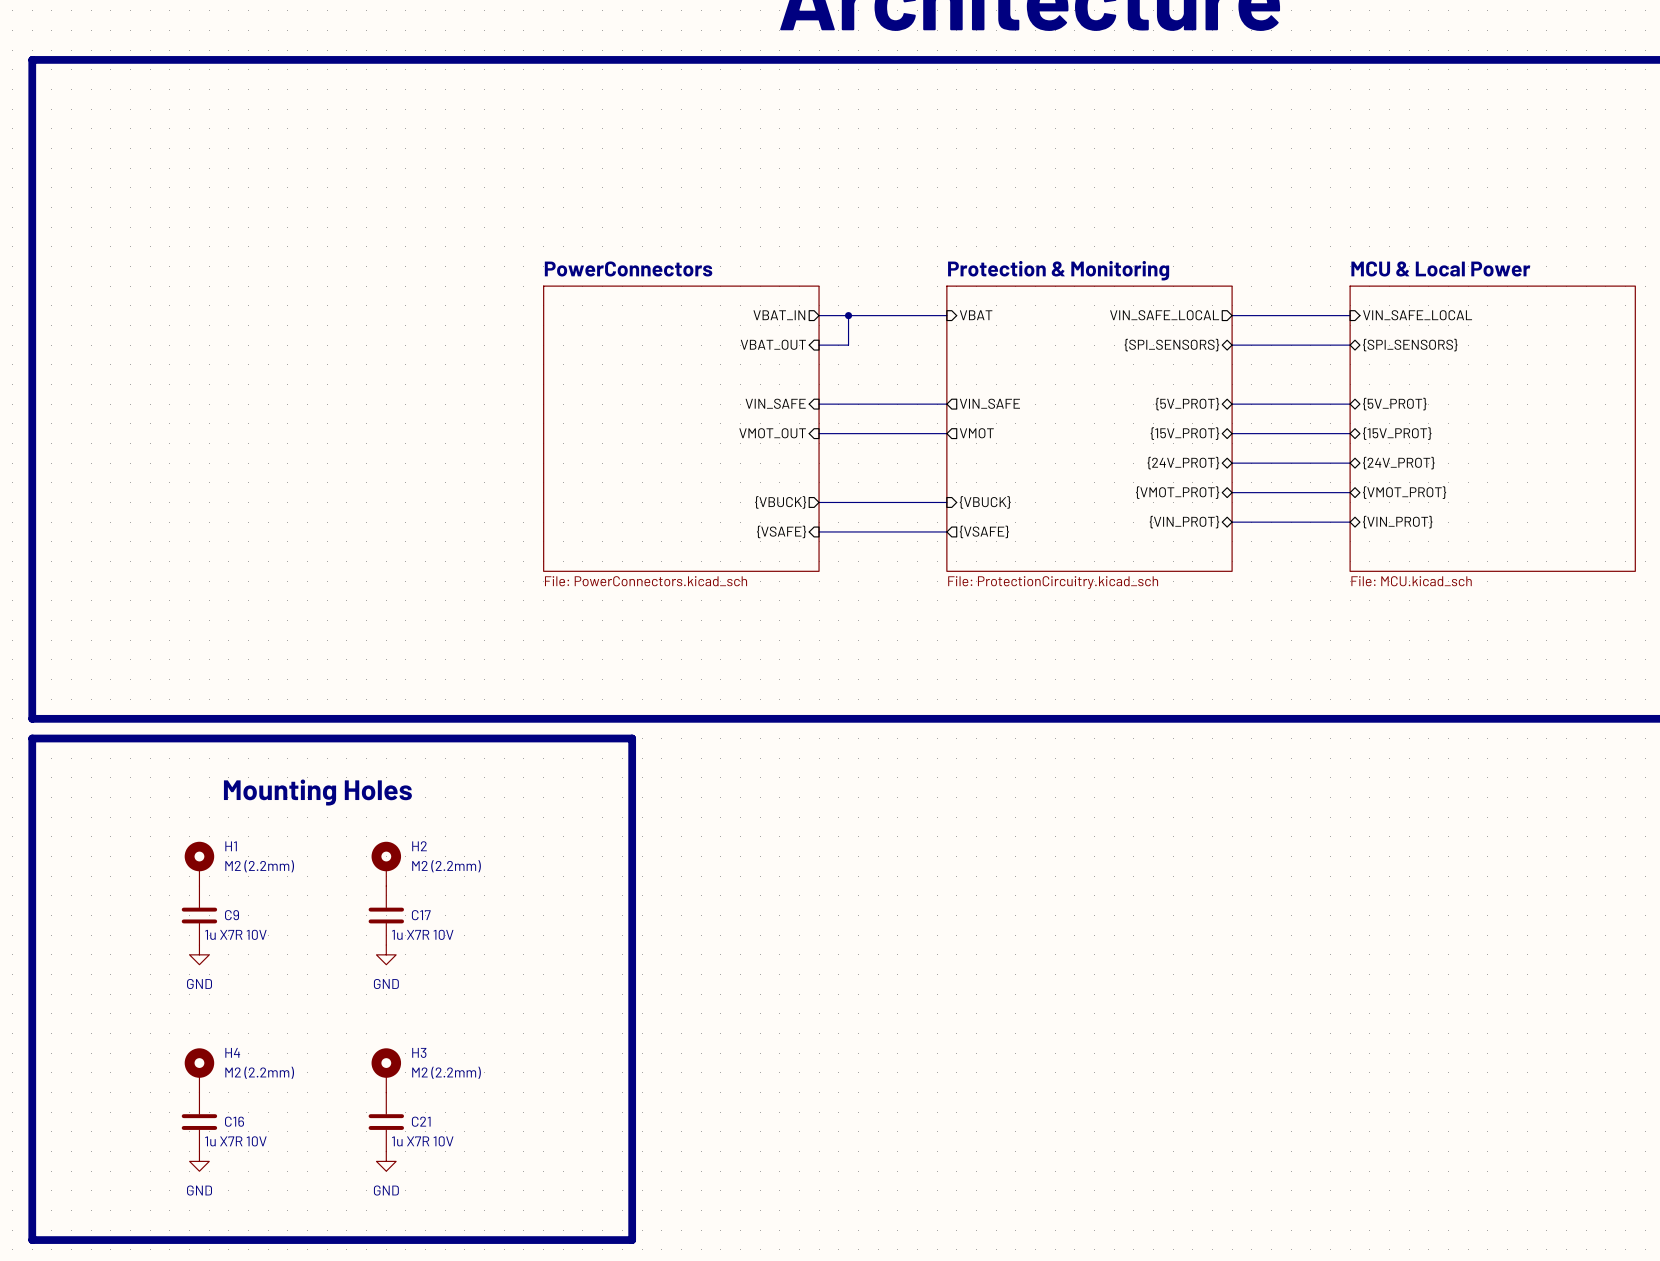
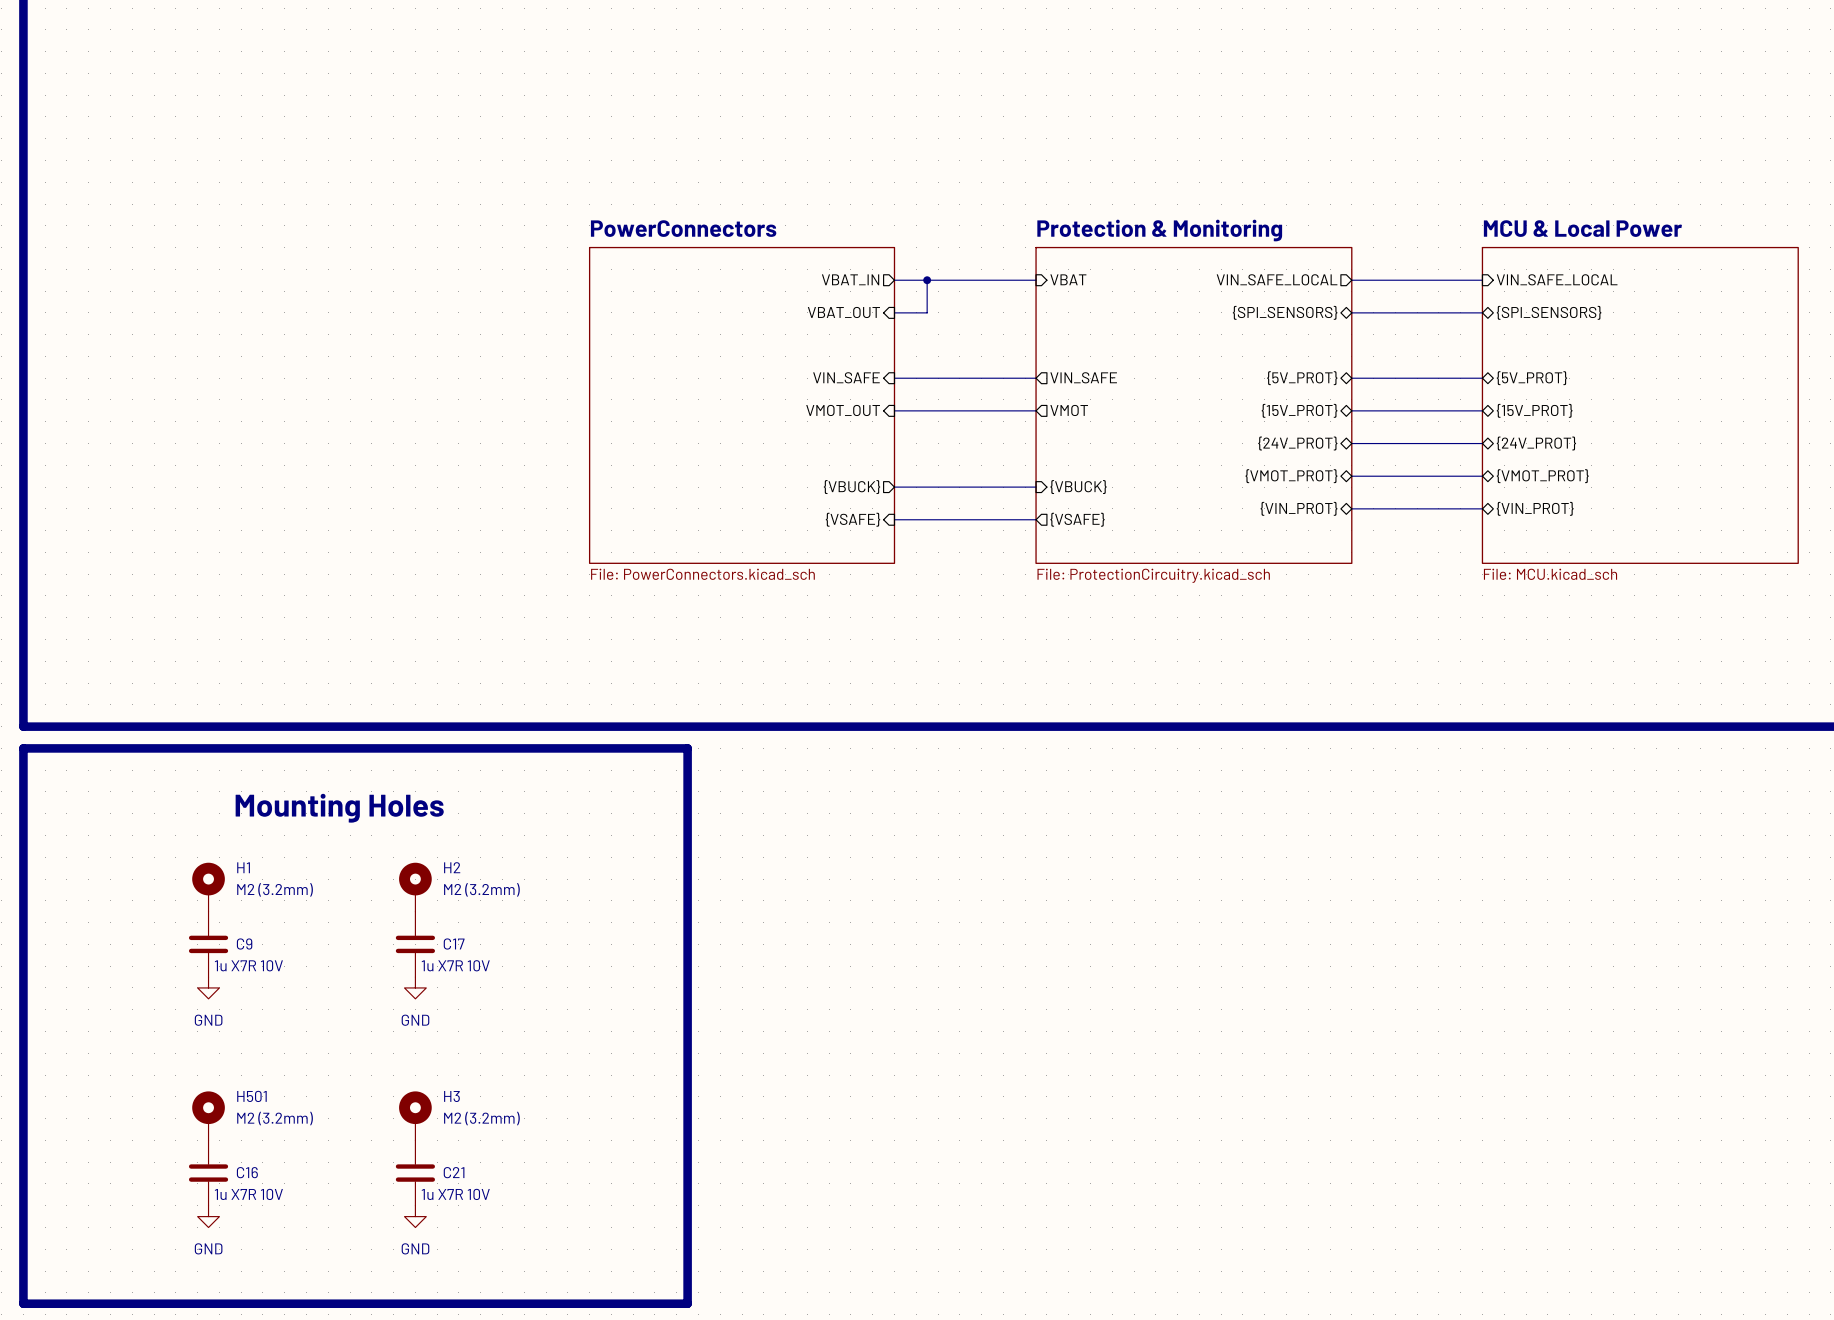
H1 value: M2 (2.2mm) (259, 866) -> M2 (3.2mm) (275, 889)
H2 value: M2 (2.2mm) (446, 866) -> M2 (3.2mm) (481, 889)
H4 name: H4 (232, 1052) -> H501 (251, 1096)
H4 value: M2 (2.2mm) (259, 1072) -> M2 (3.2mm) (275, 1118)
H3 value: M2 (2.2mm) (446, 1072) -> M2 (3.2mm) (481, 1118)

